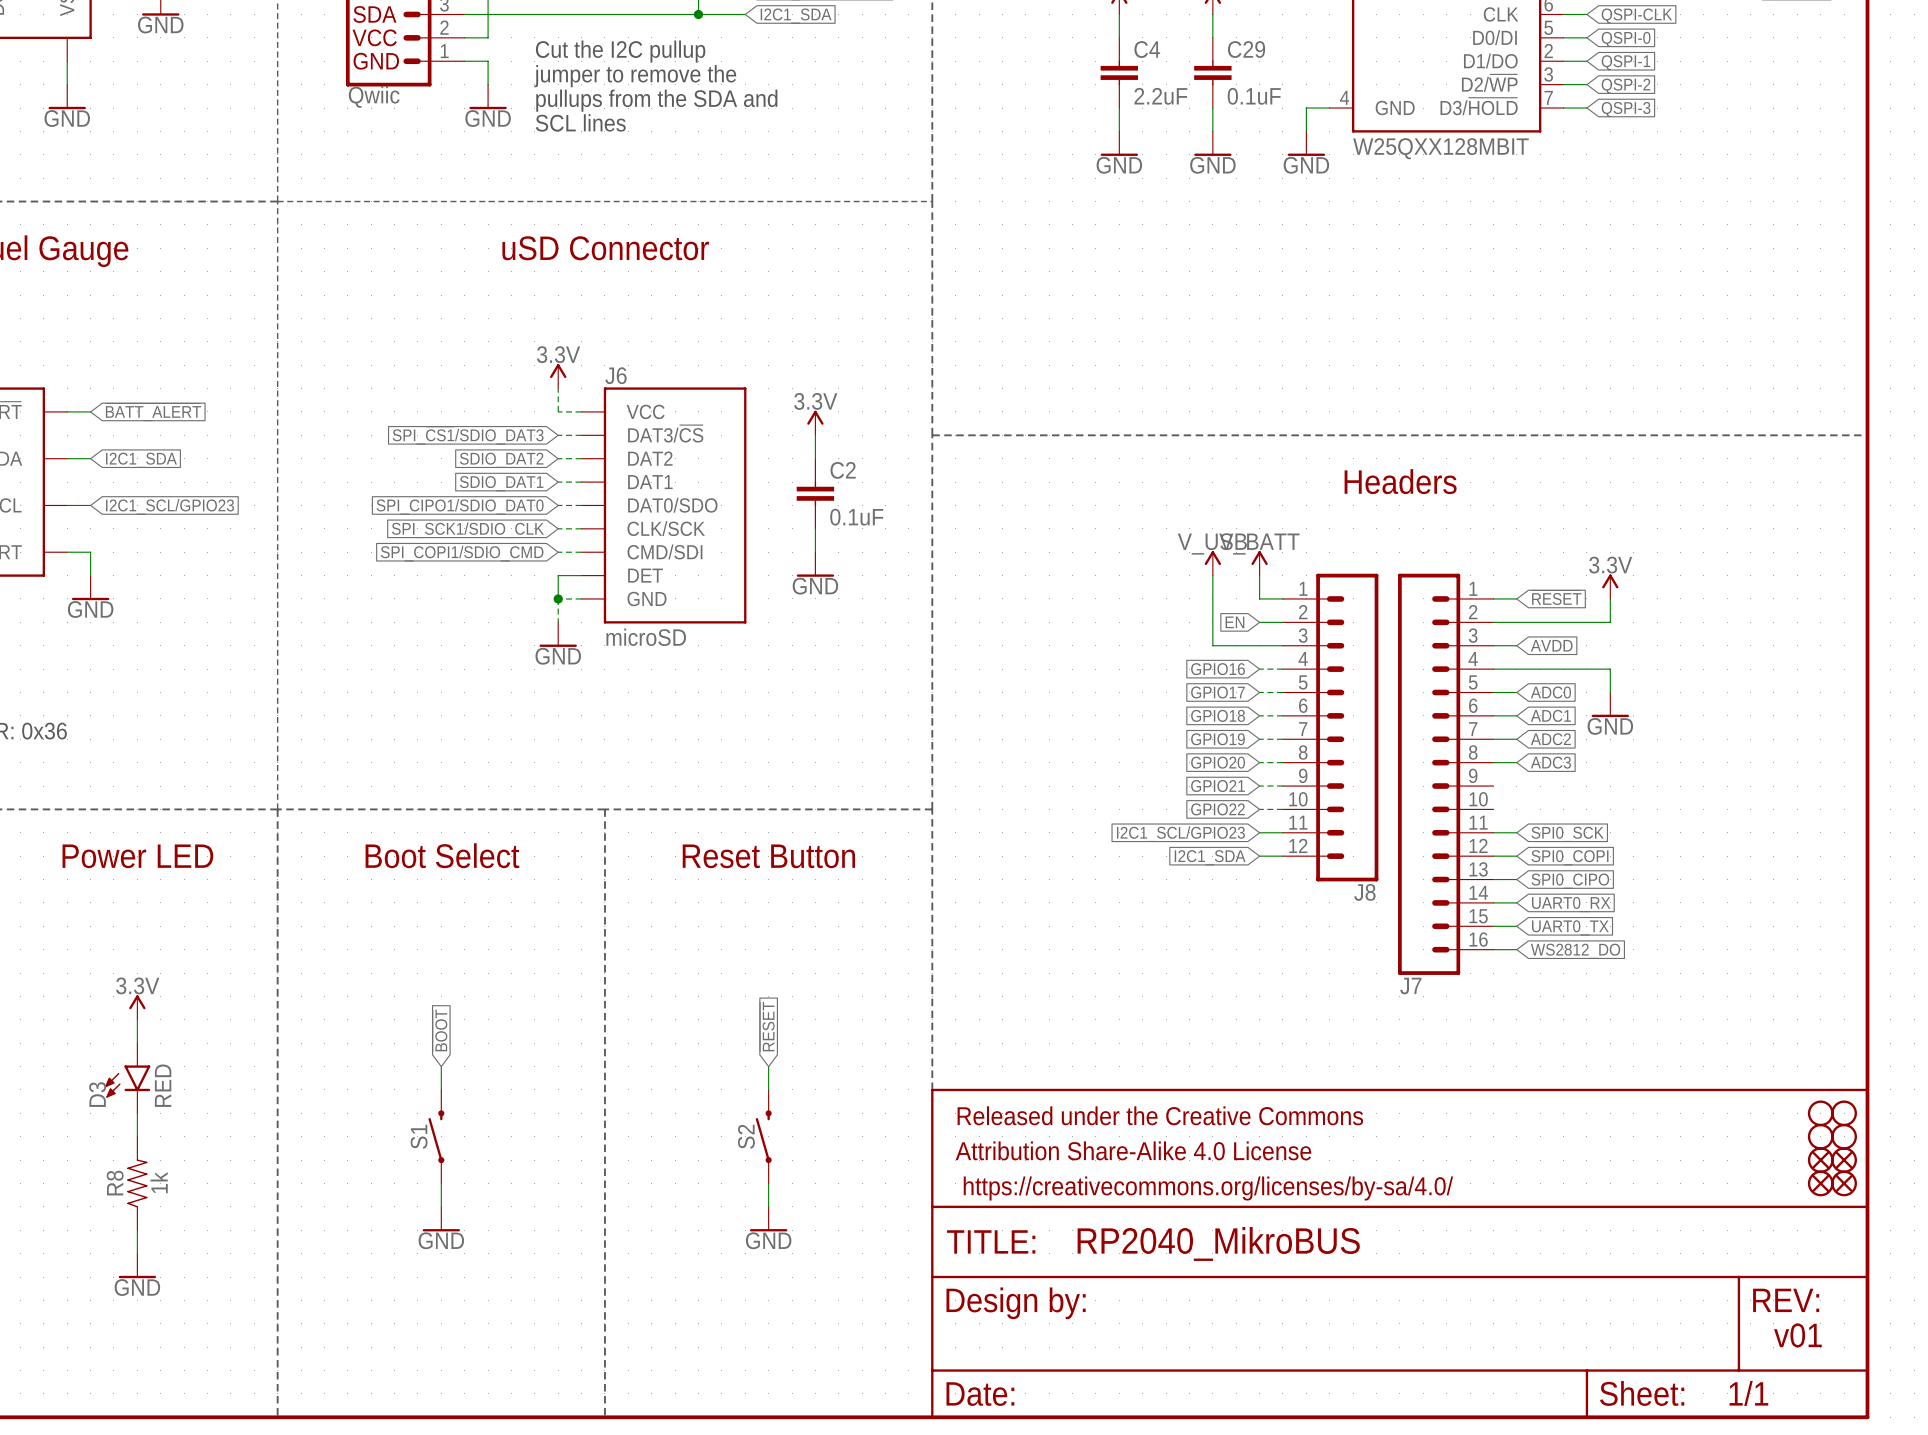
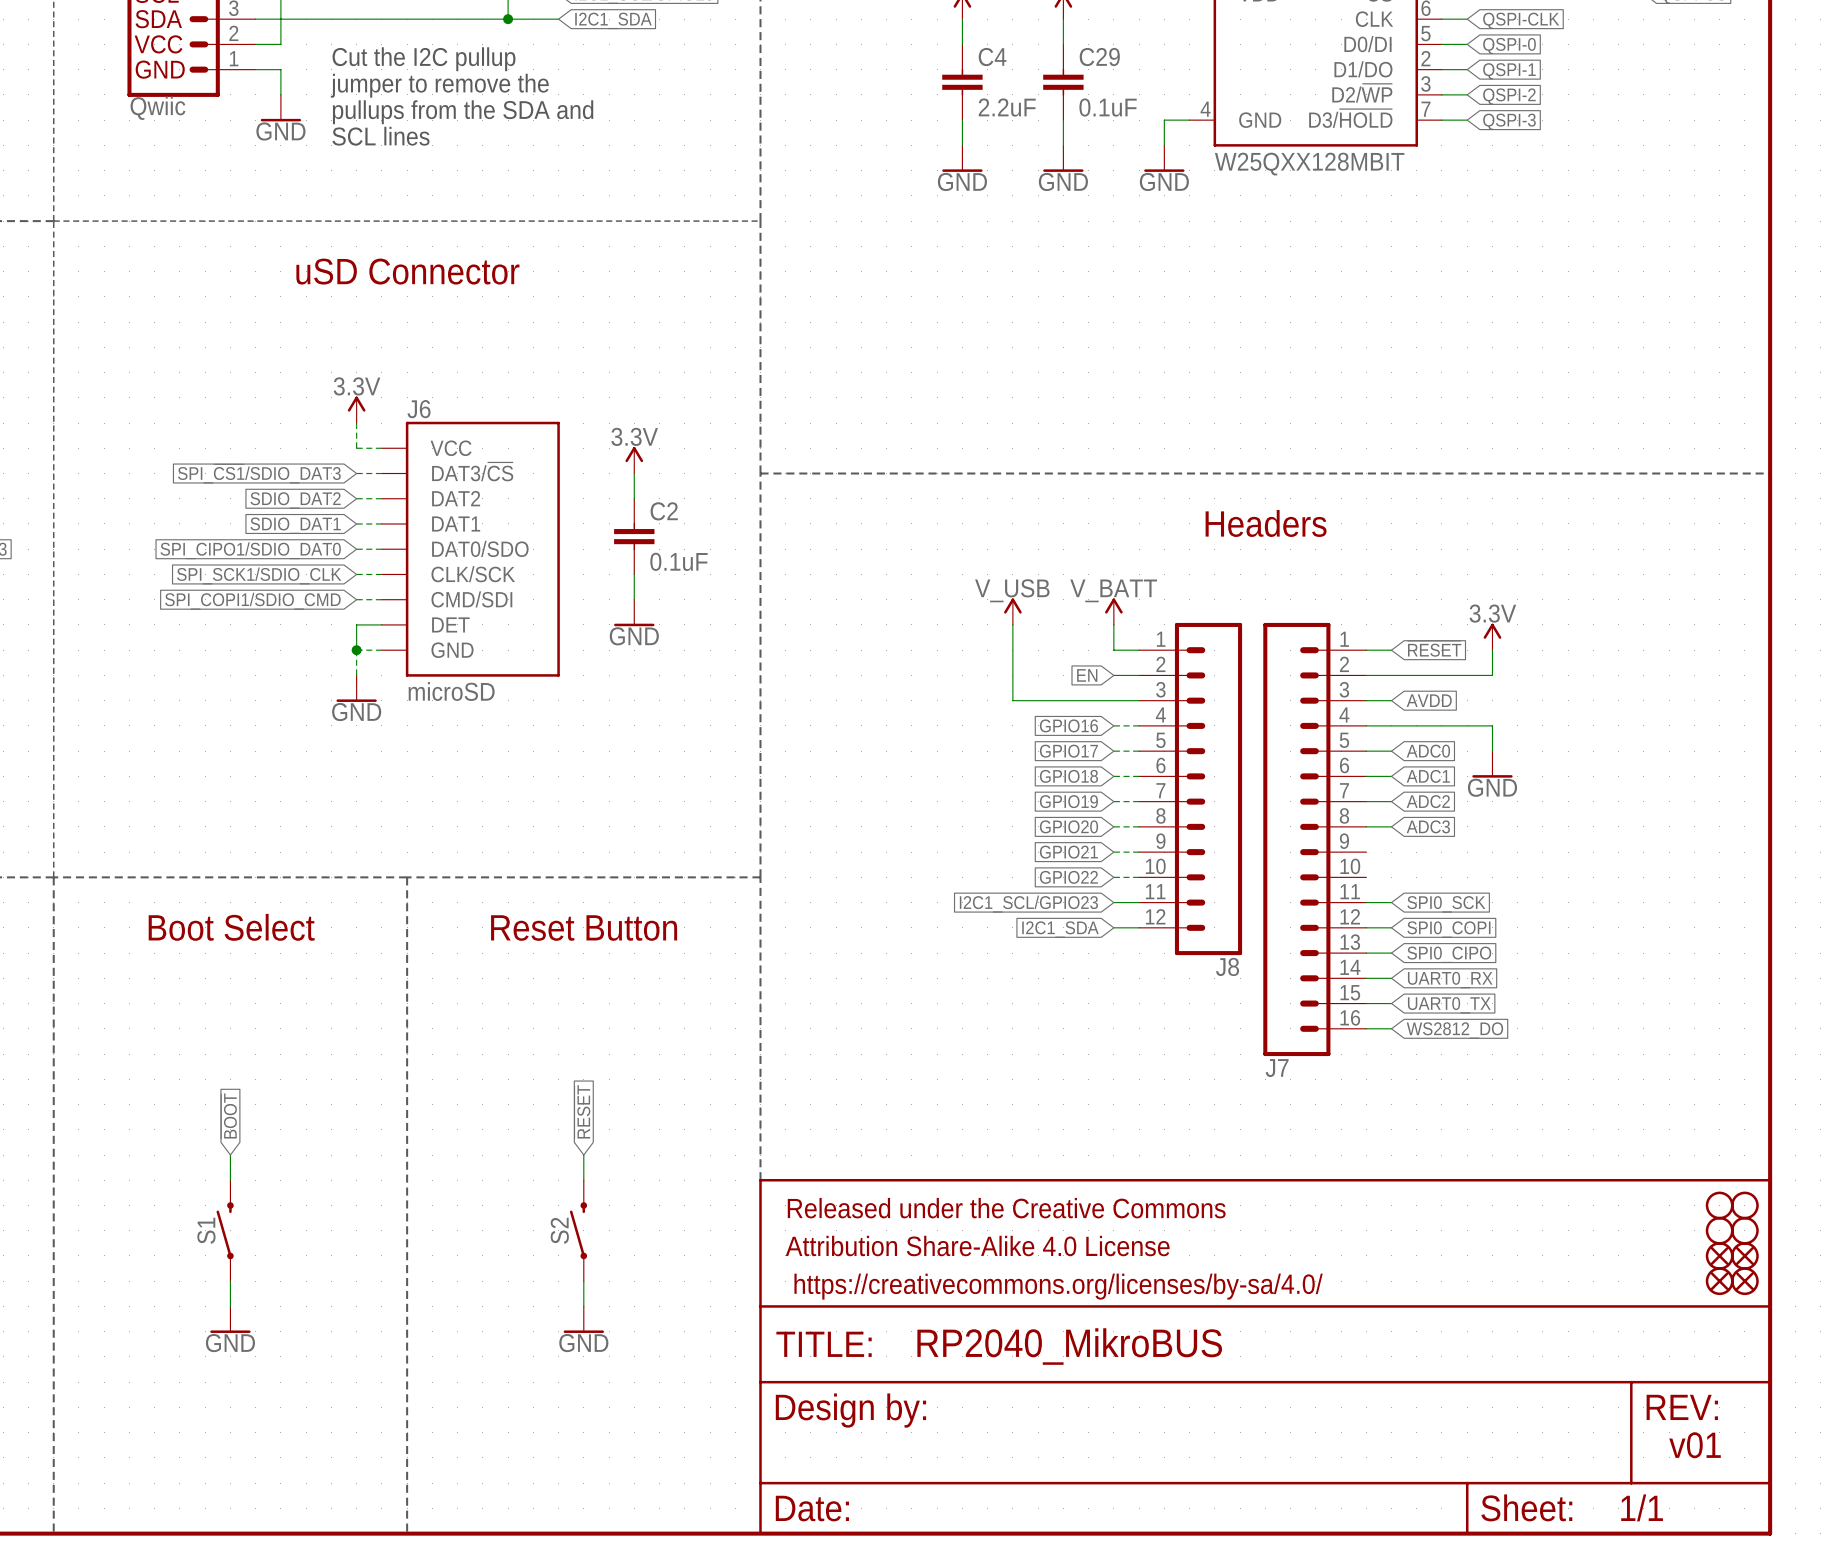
power symbol position: V_USB (1212, 563) -> V_USB (1012, 611)
wire: (1212, 575) (1212, 645) -> (1012, 624) (1012, 700) (1063, 700)

